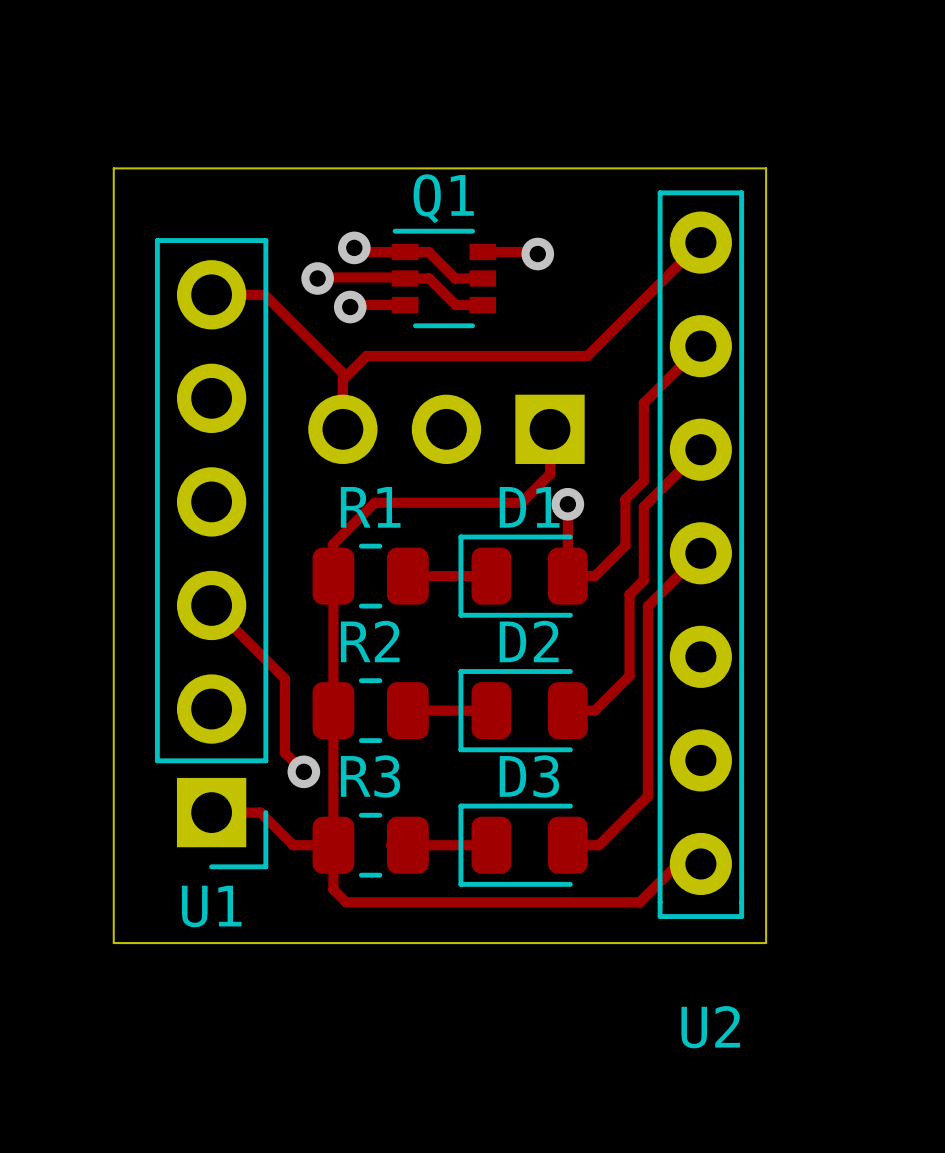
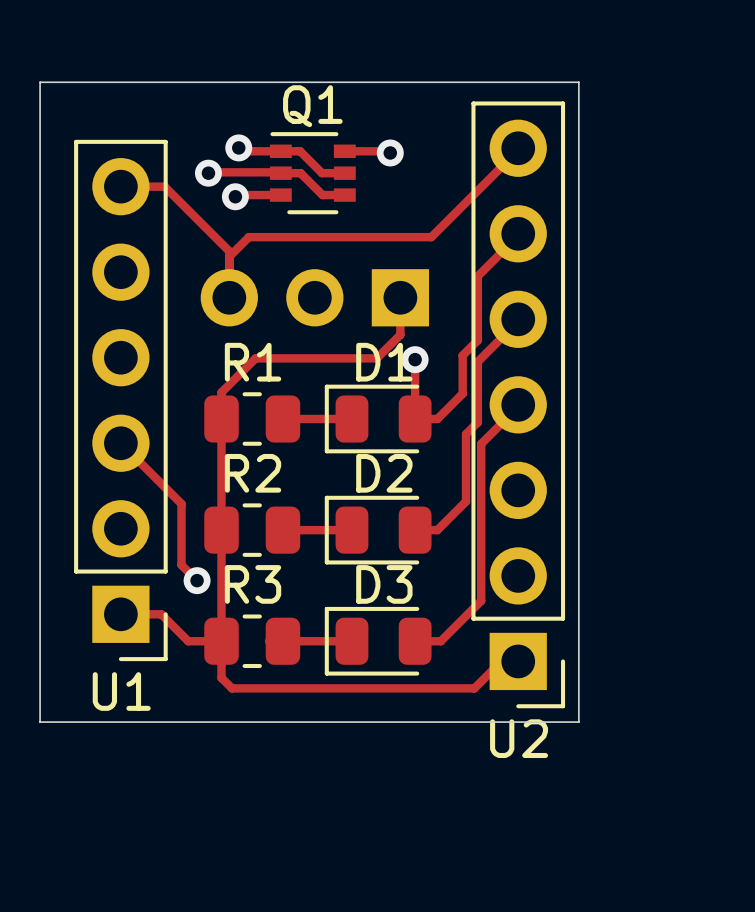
U2 footprint: [657, 190, 745, 920] -> [471, 101, 566, 709]

